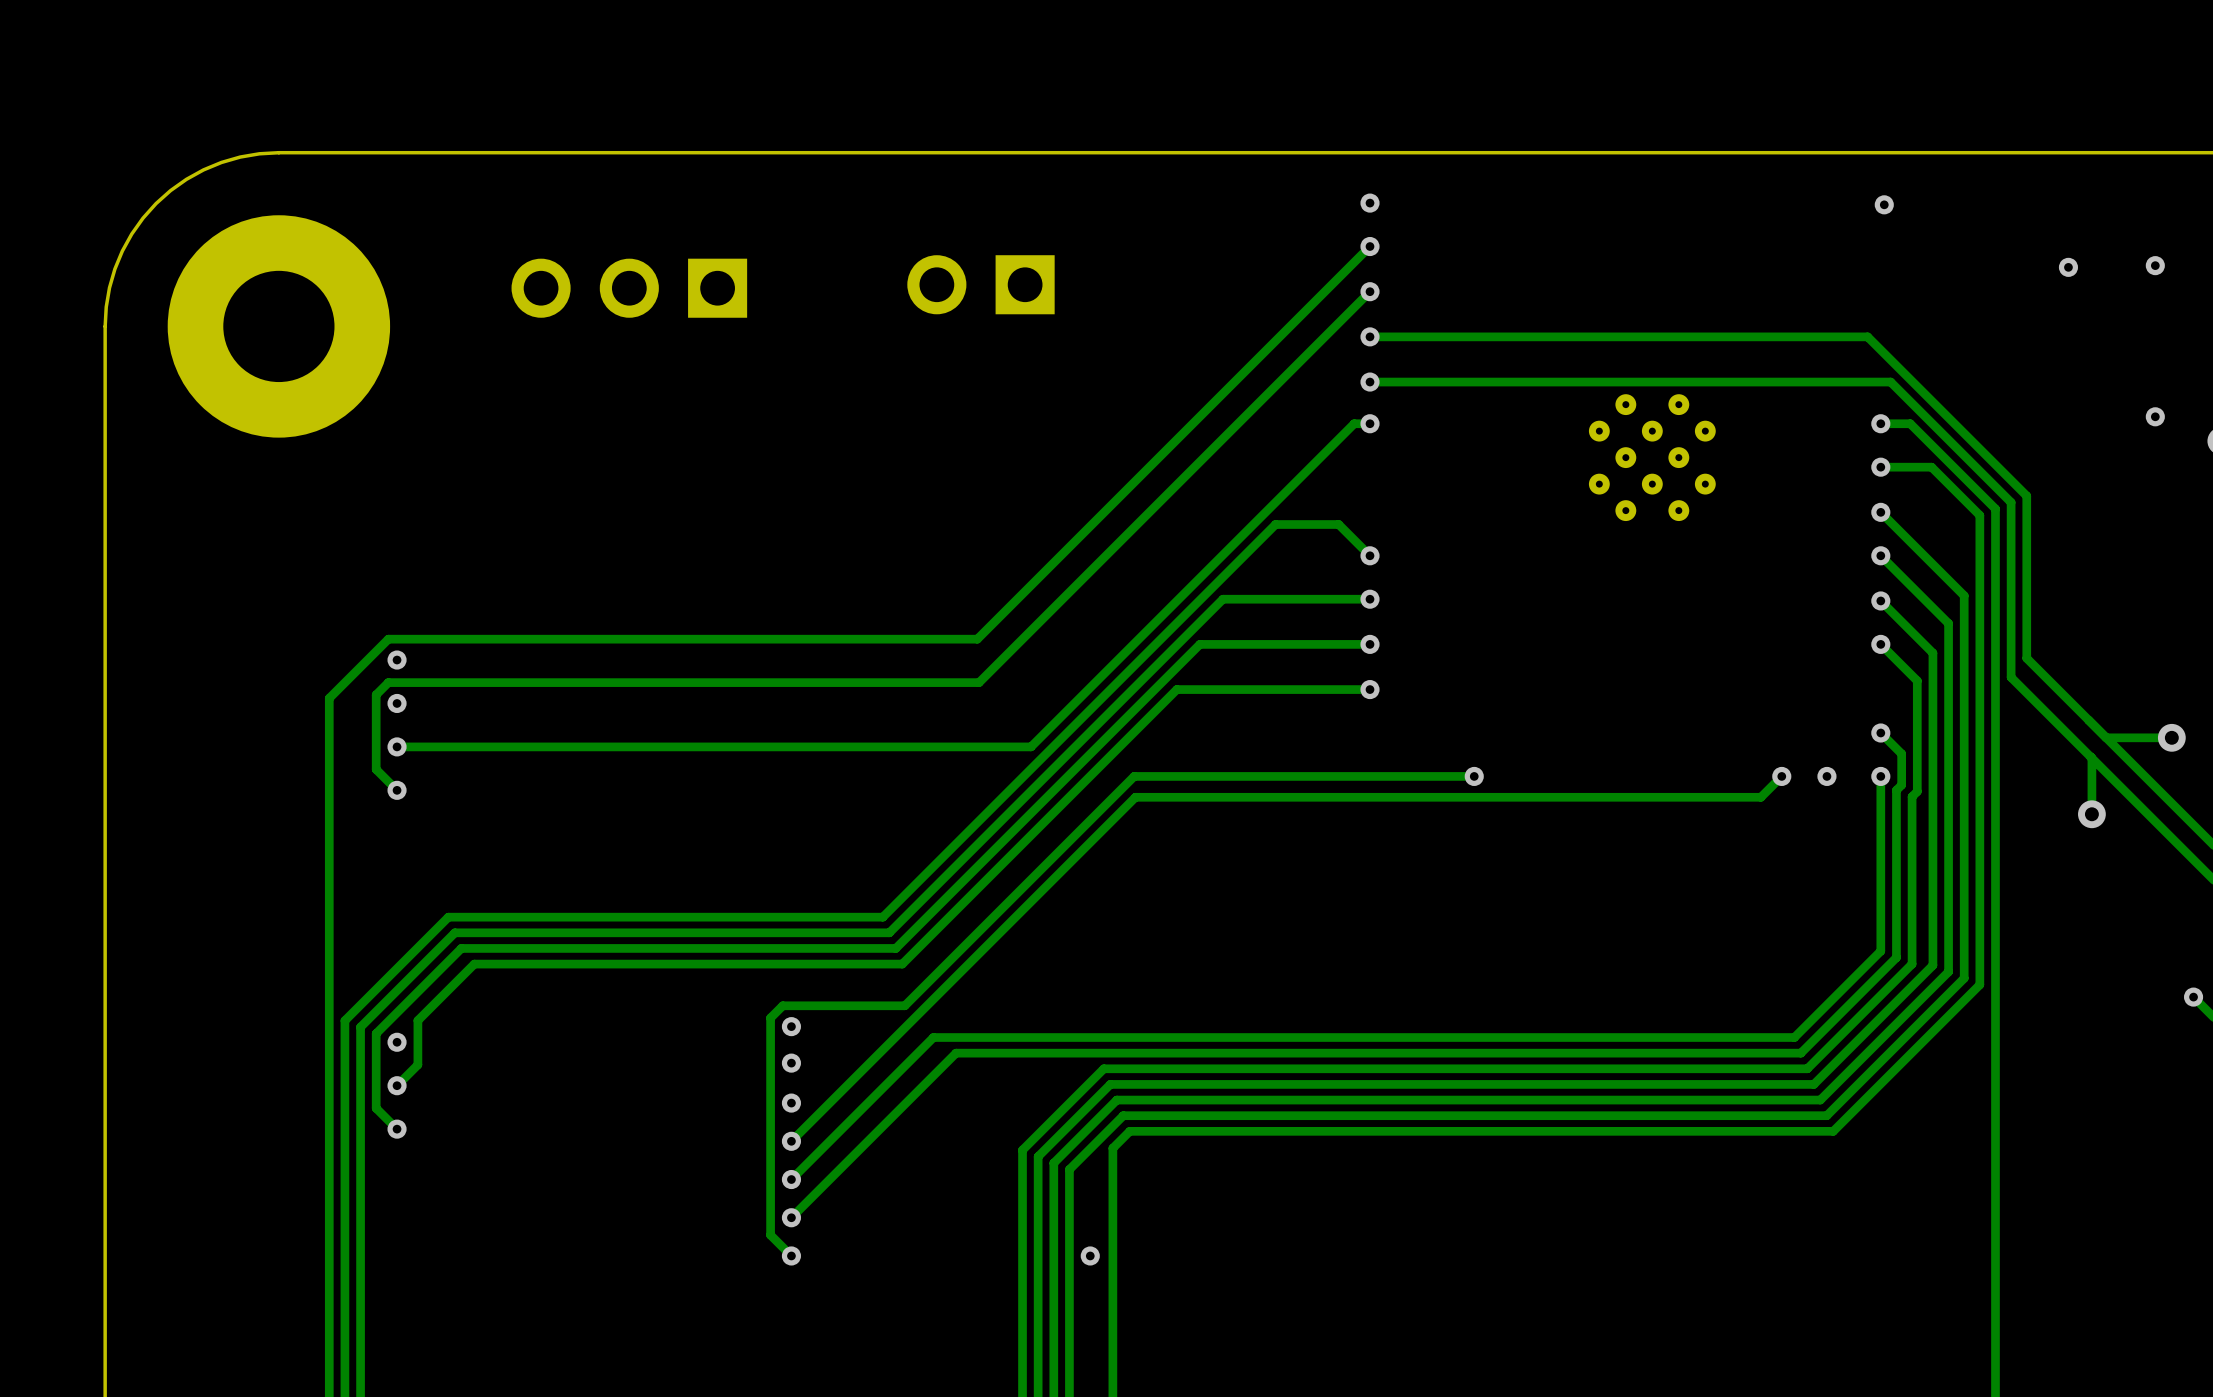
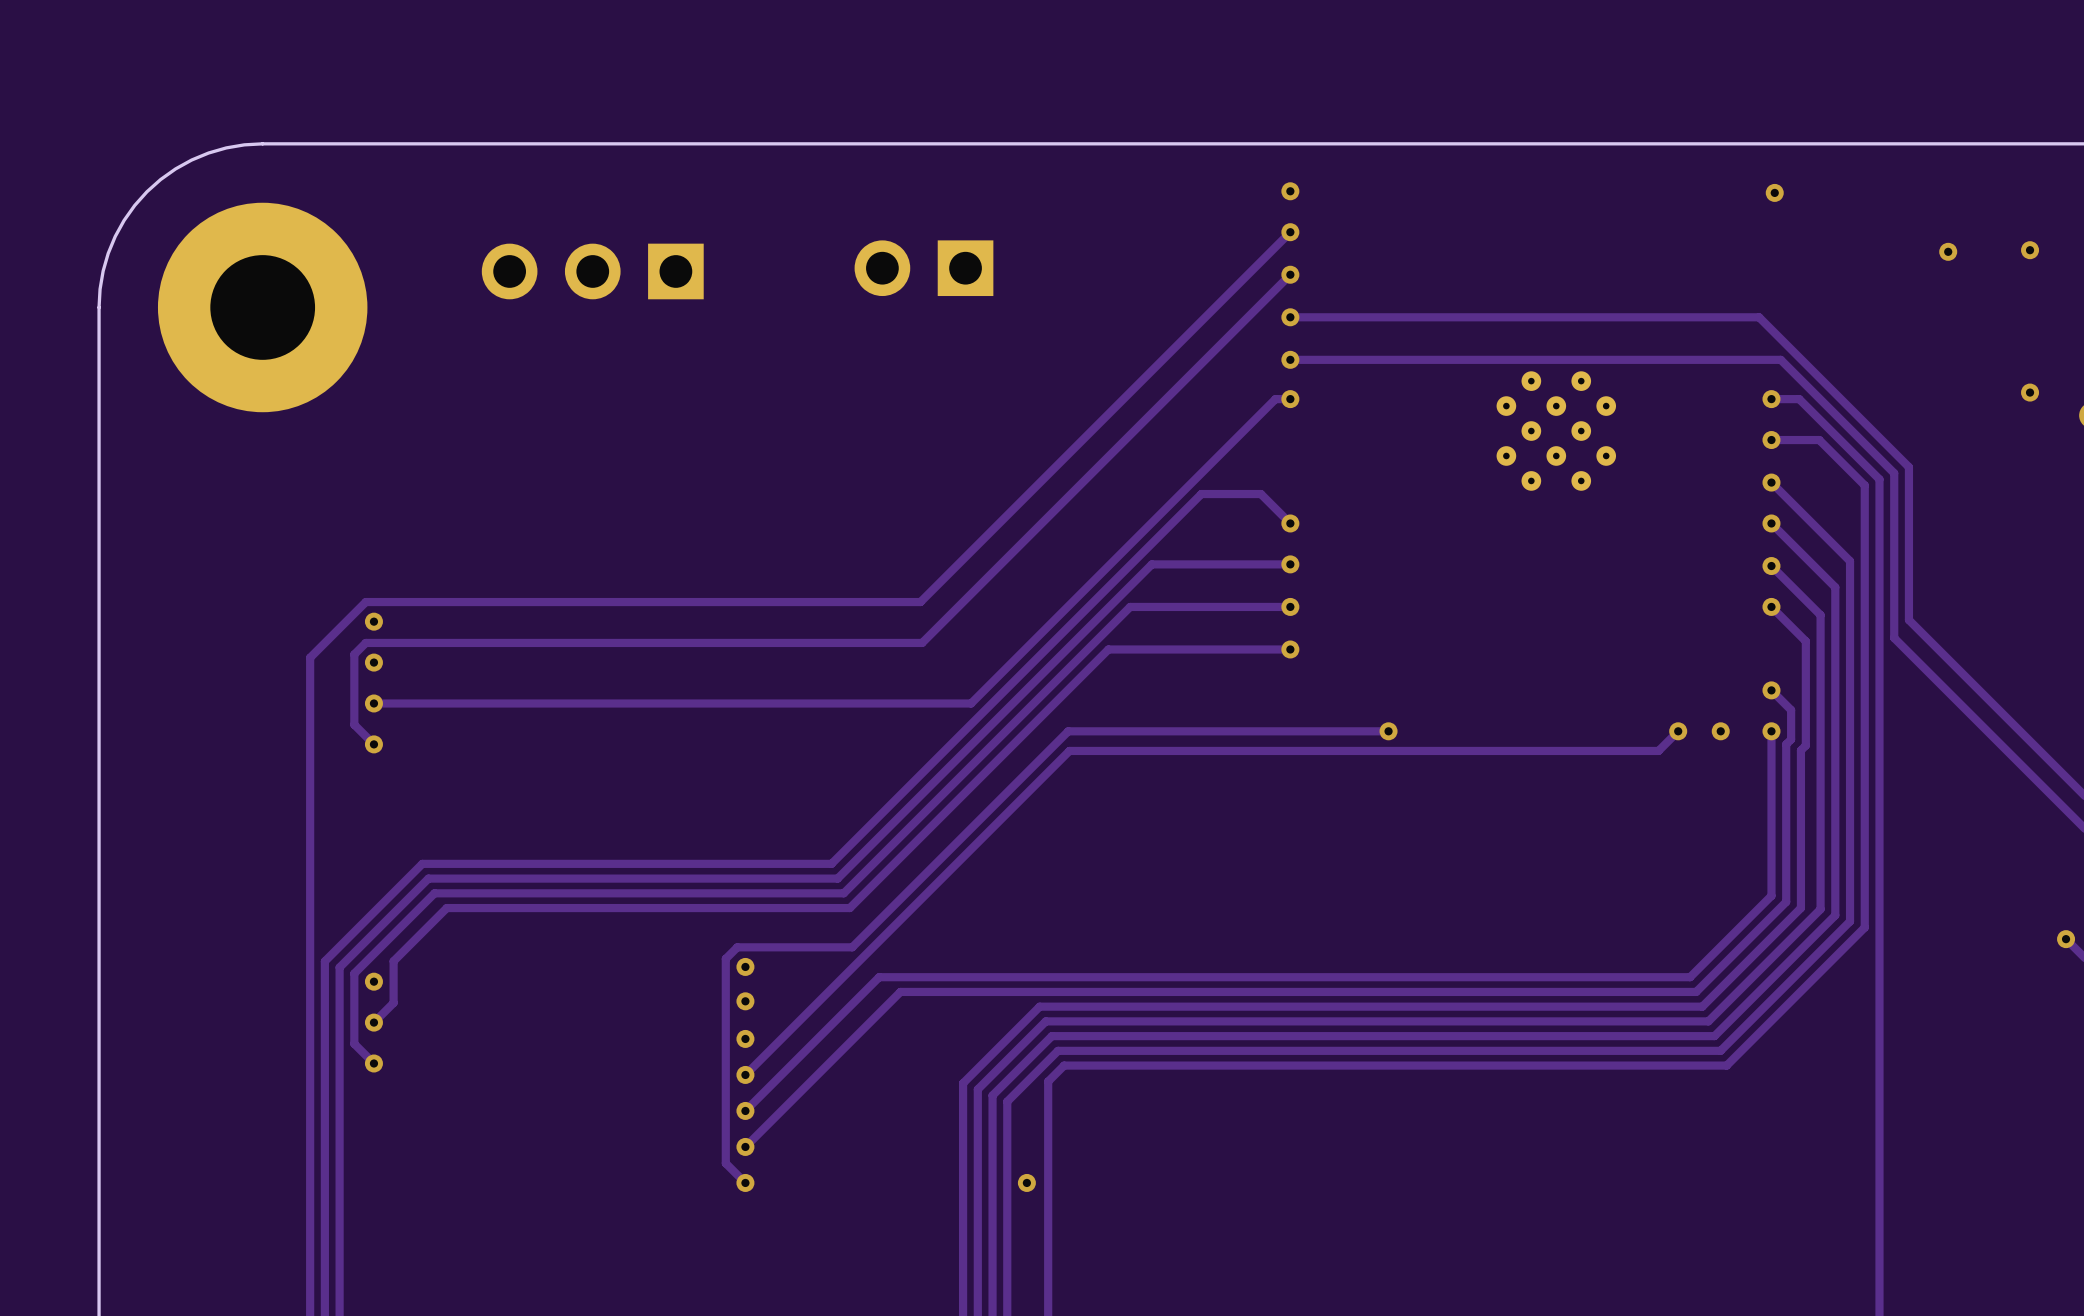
track: (2088, 720) (2106, 737) (2171, 737) -> none
via: (2171, 737) -> none
track: (2091, 758) (2091, 814) -> none
via: (2091, 814) -> none

